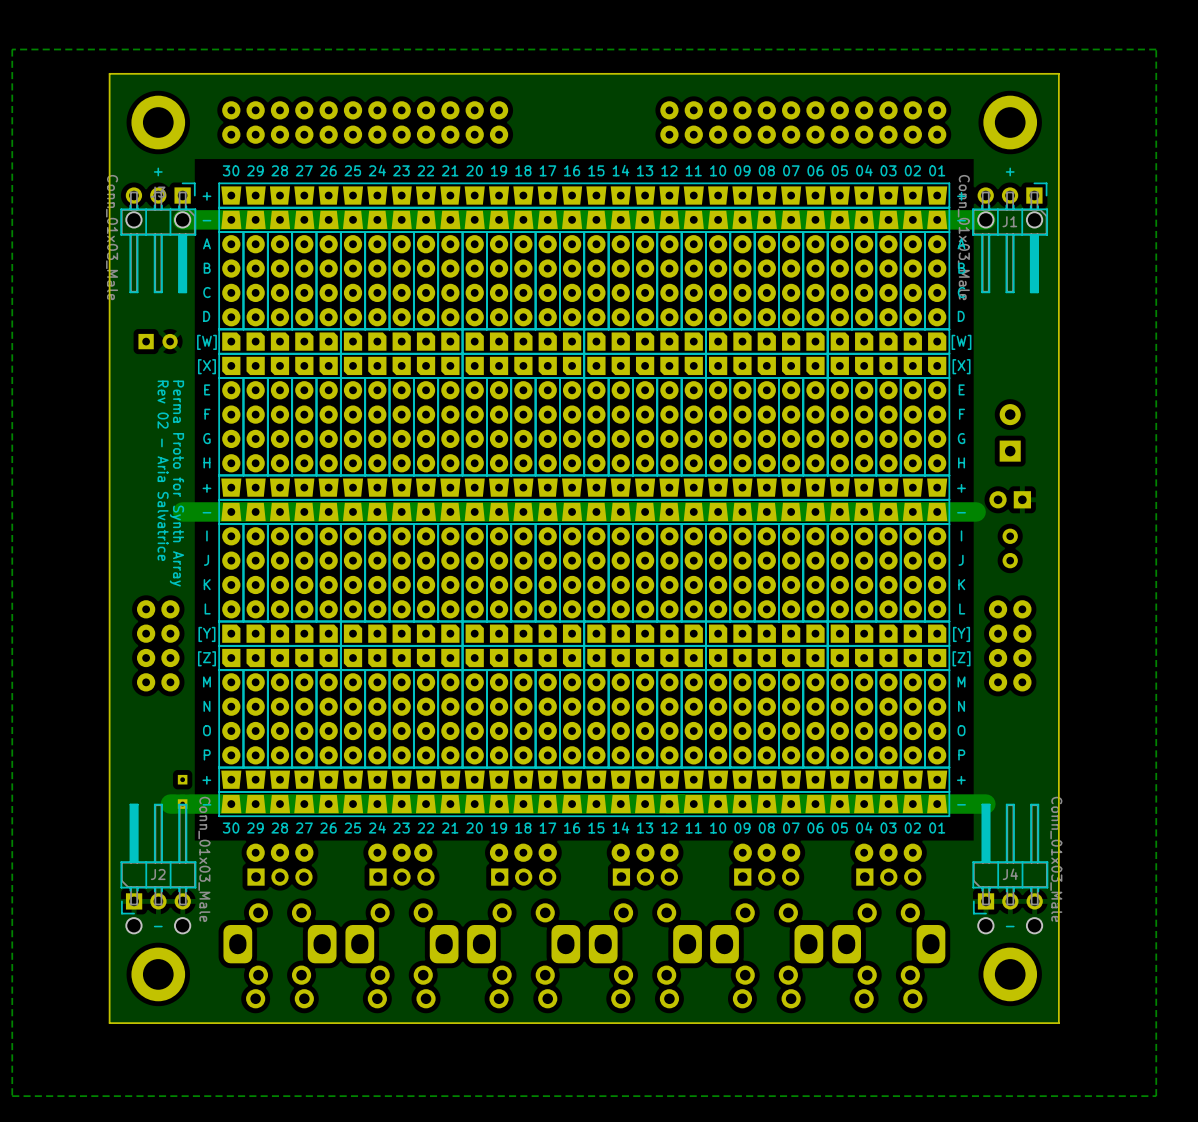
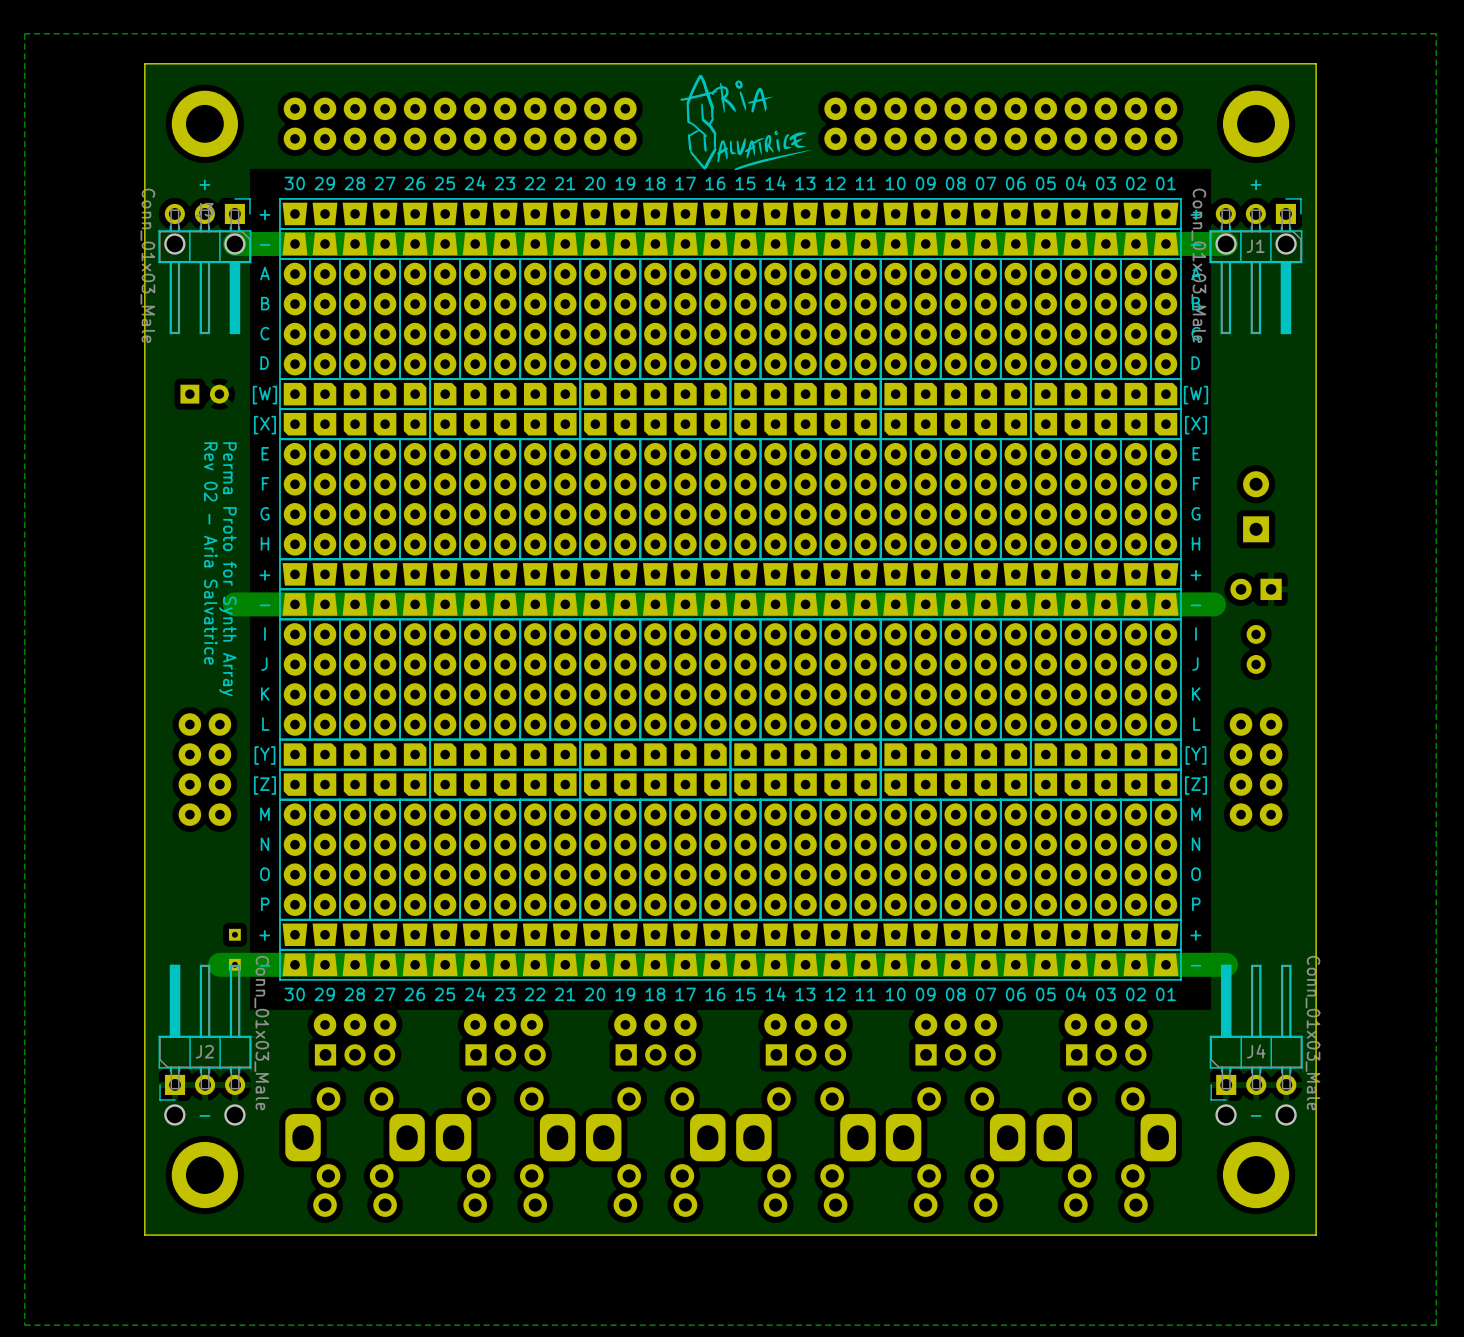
drawing: none -> [680, 74, 811, 171]

